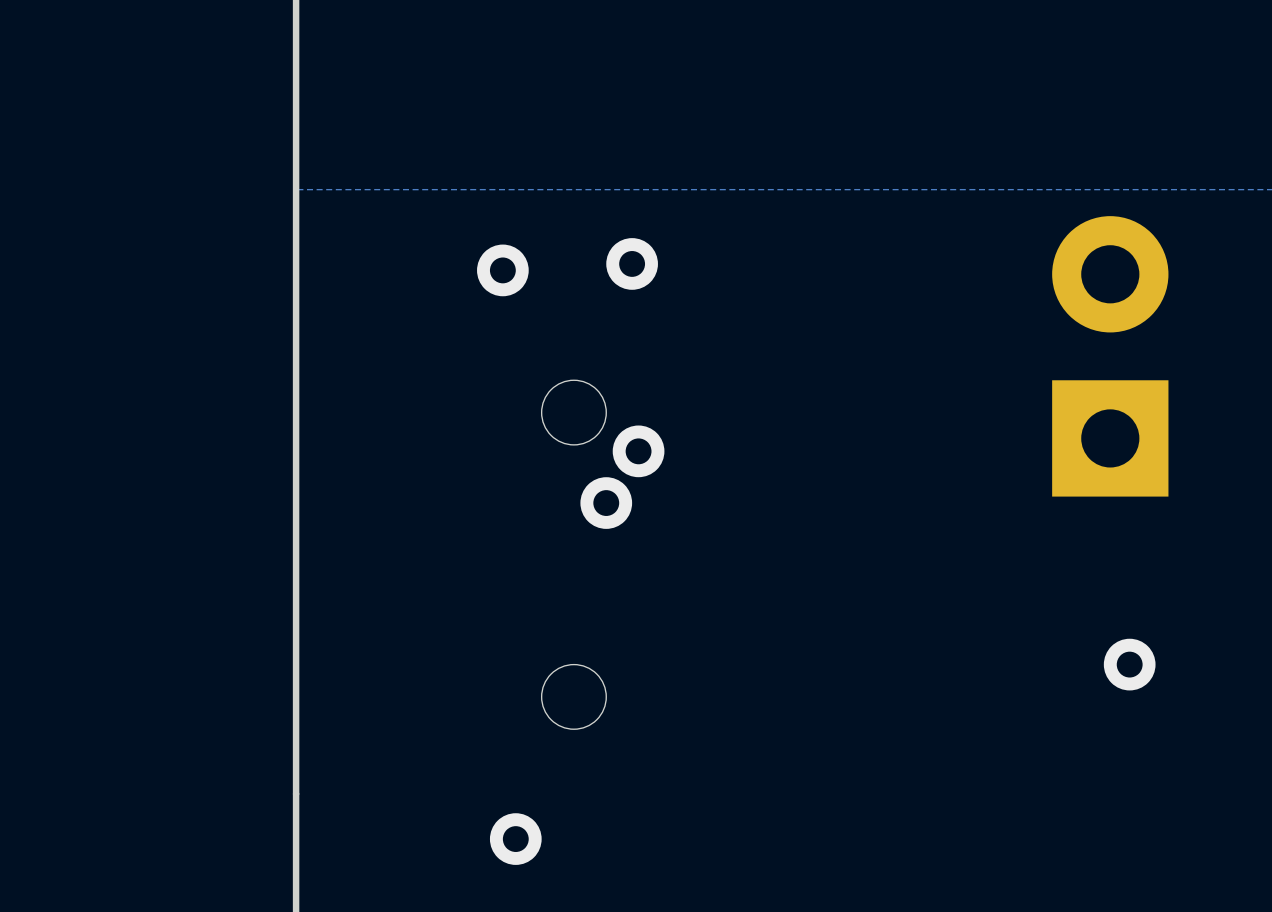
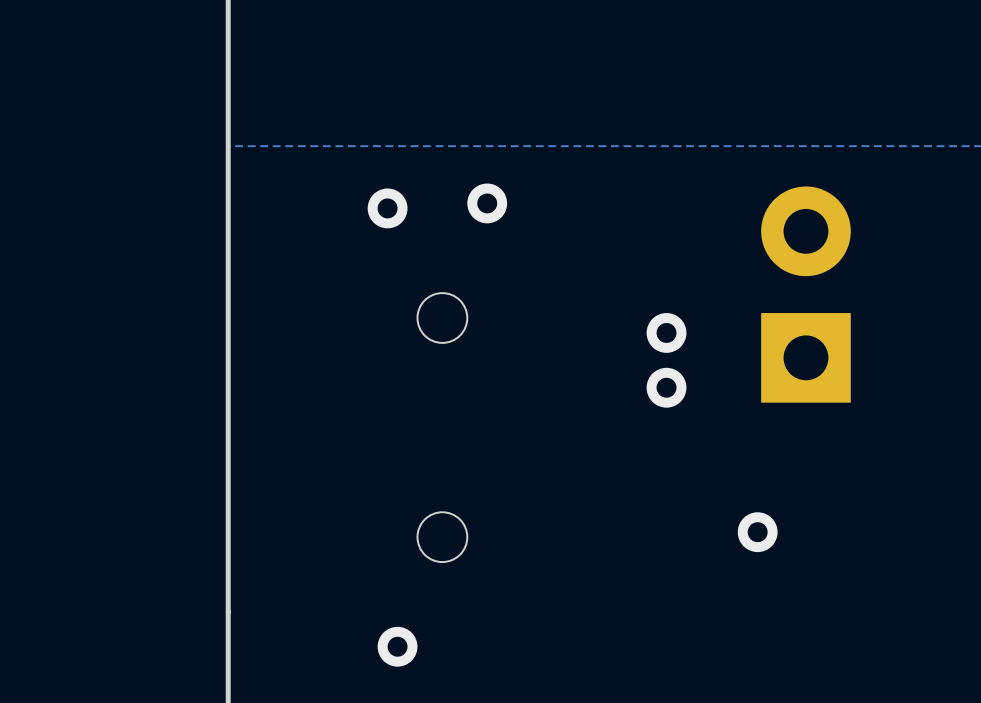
part position: (1110, 356) -> (805, 294)
via: none -> (666, 332)
via: (638, 451) -> none
via: (606, 503) -> none
via: none -> (666, 387)
via position: (1129, 664) -> (757, 532)

